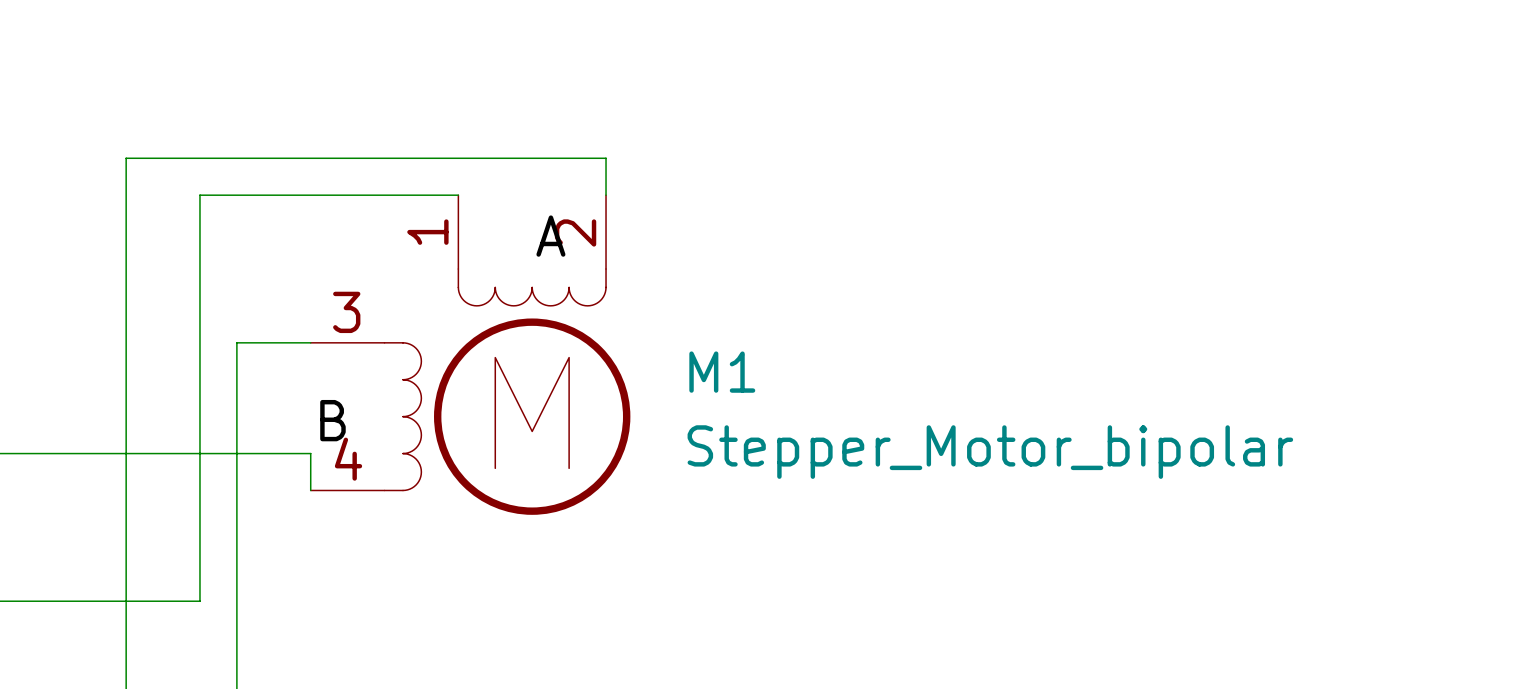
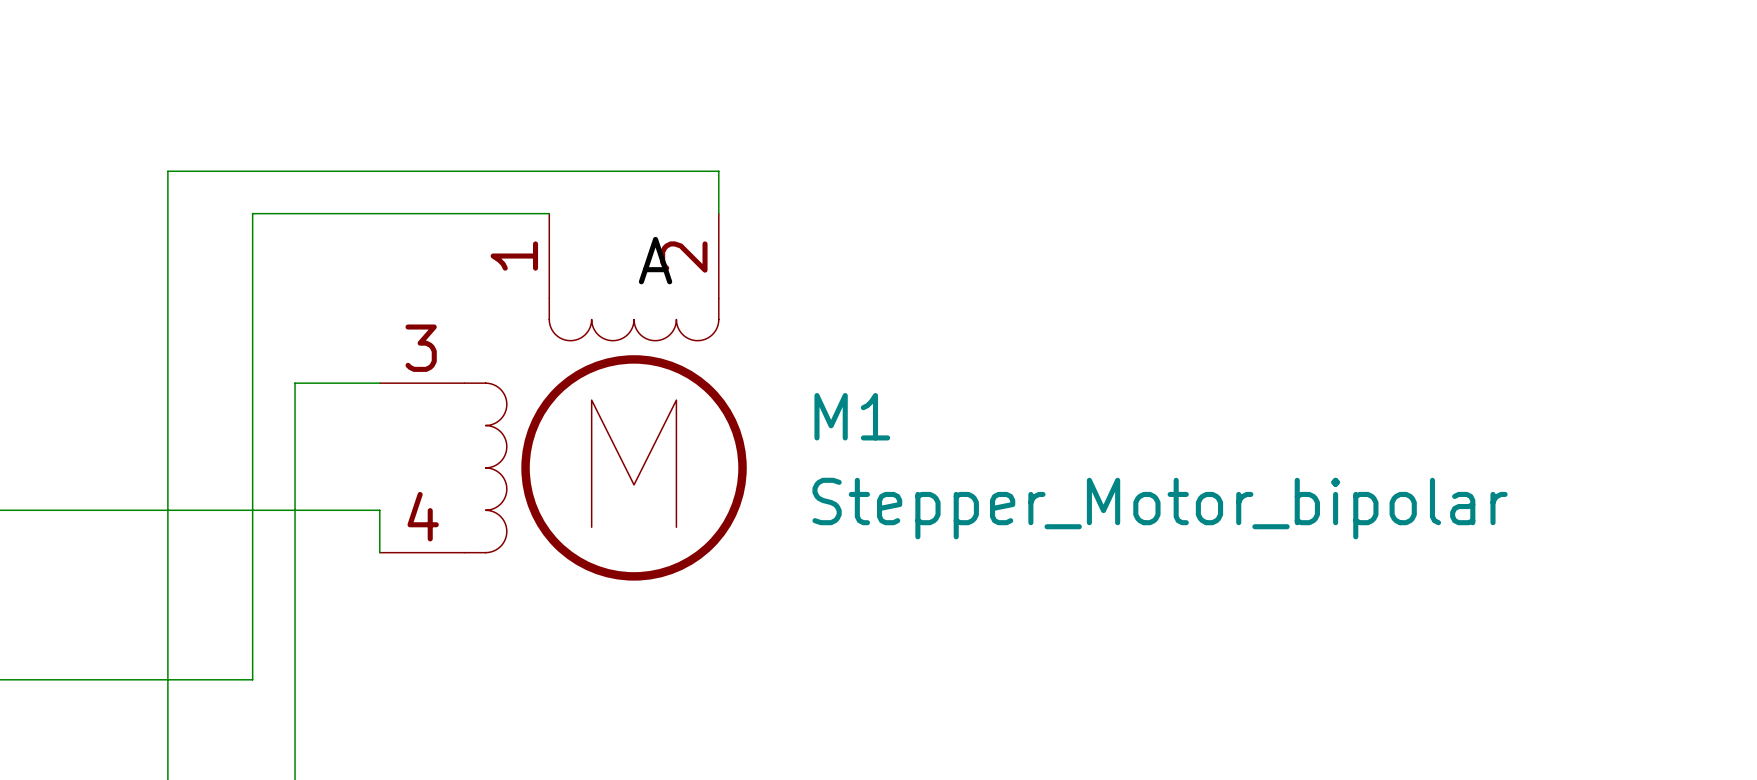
label: B (332, 420) -> none

